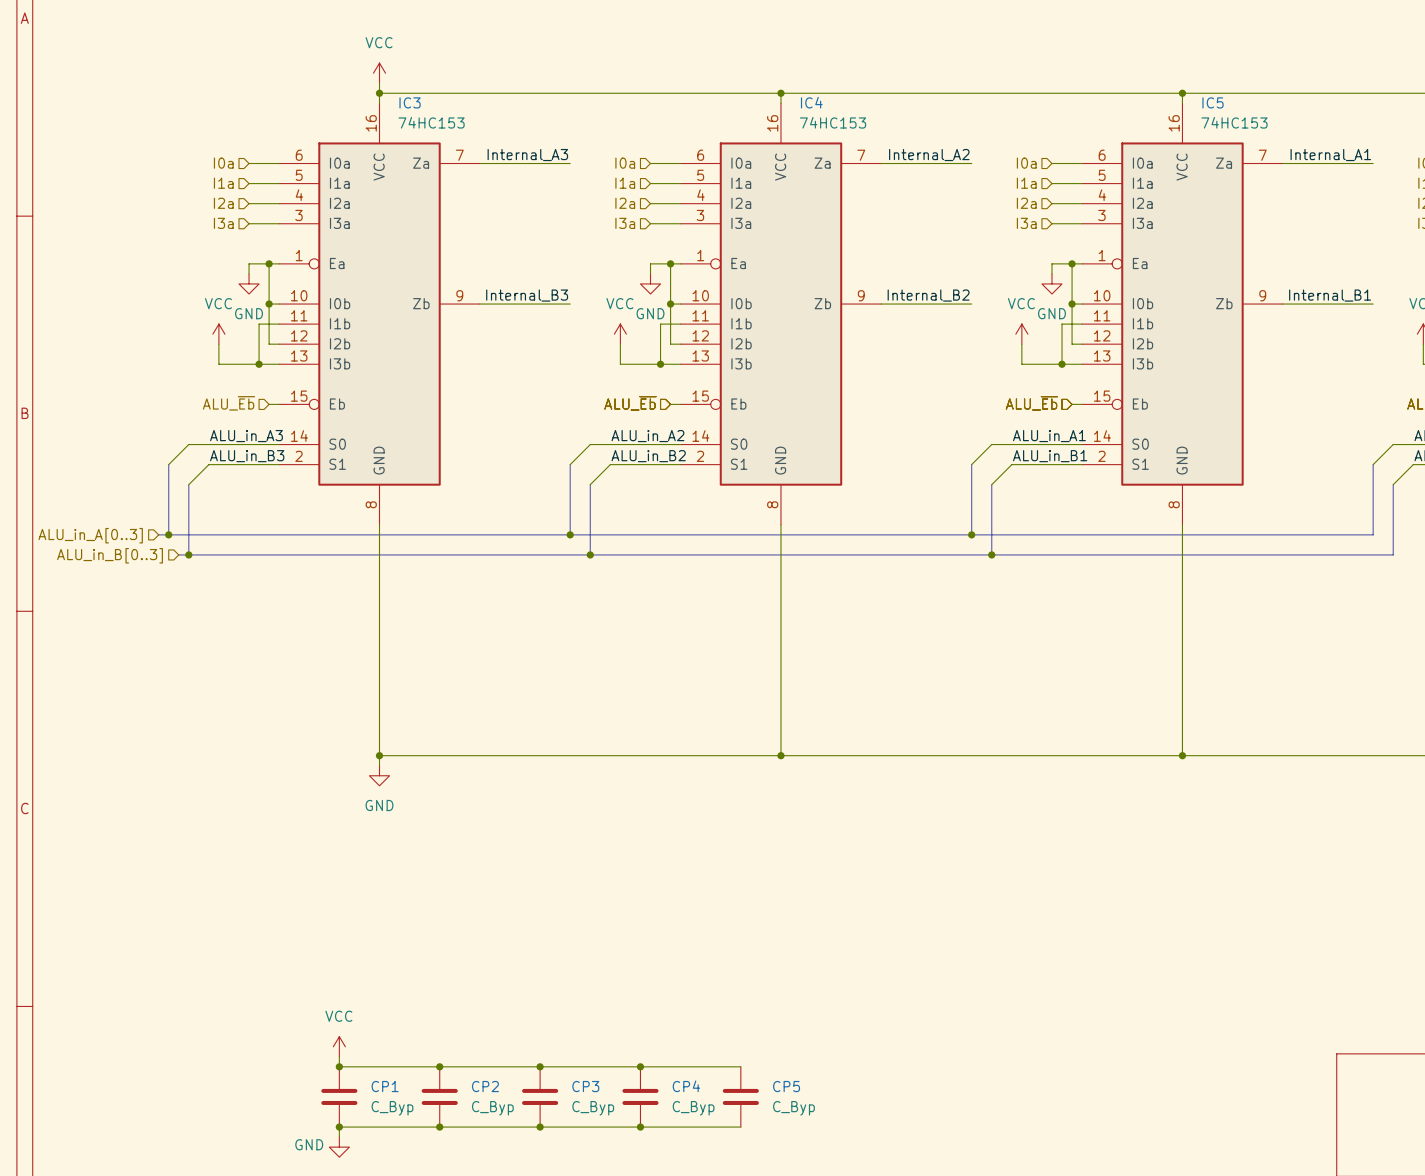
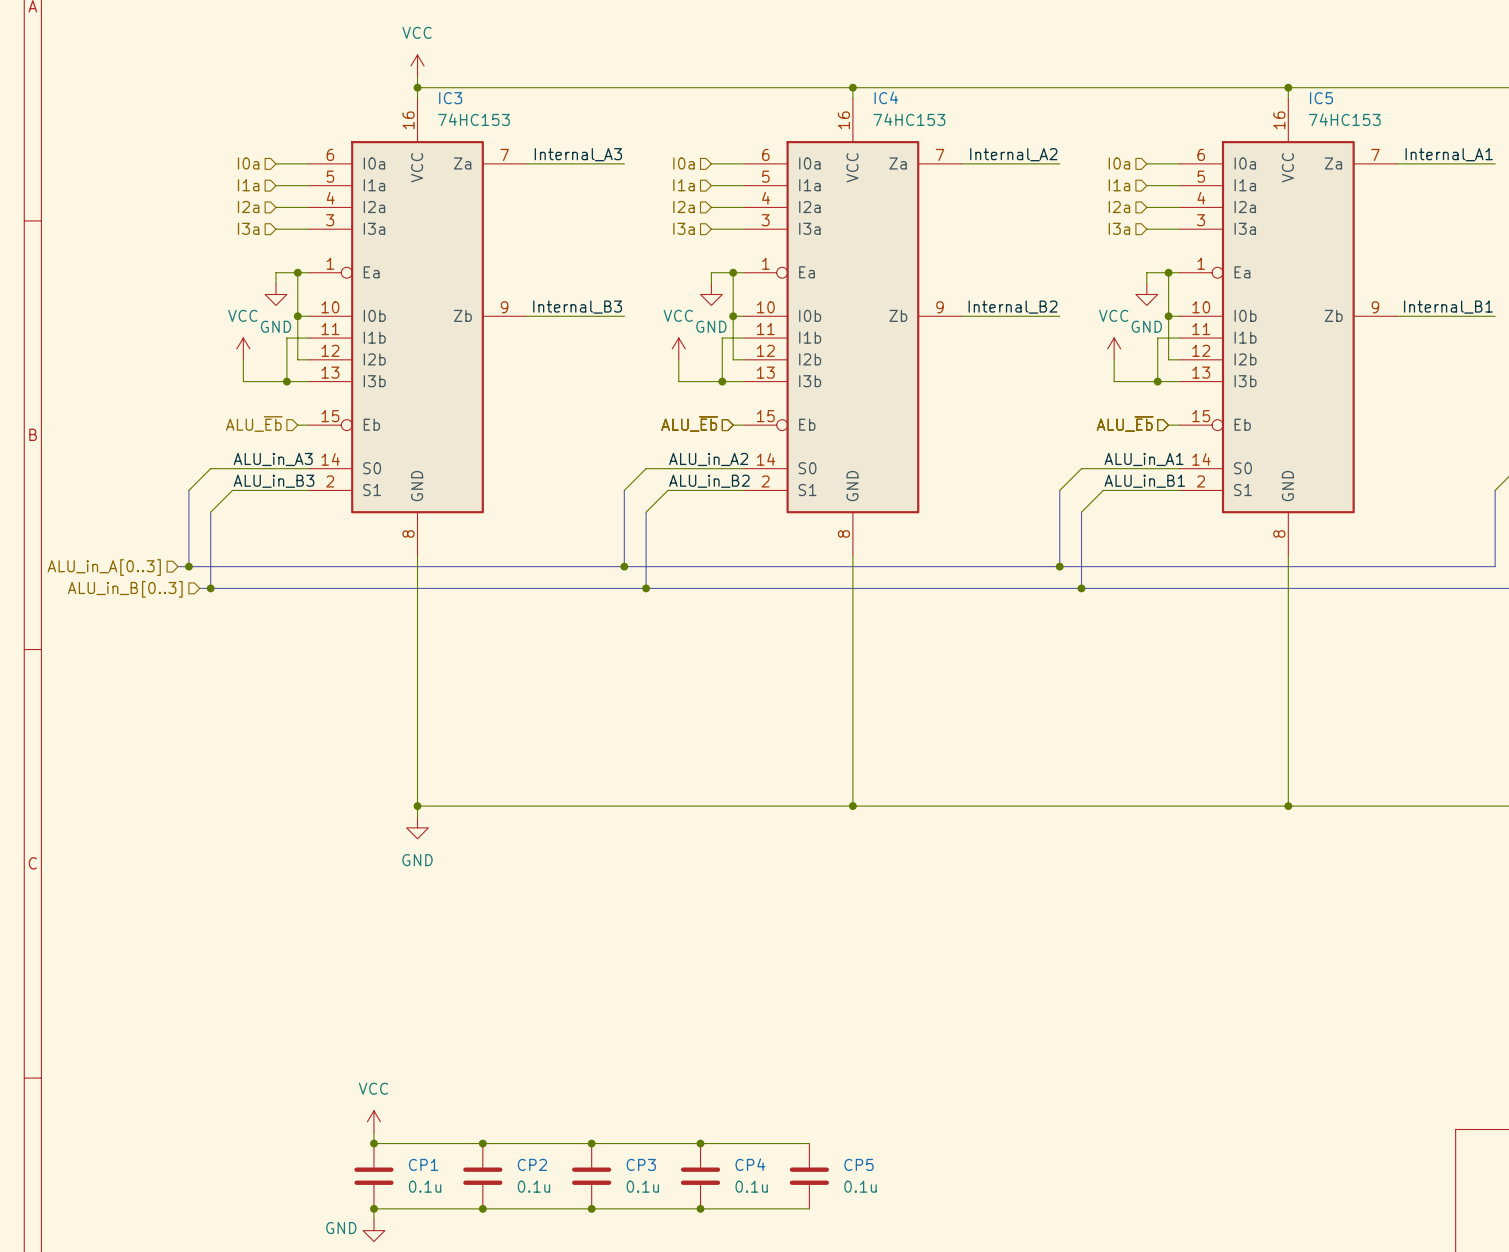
CP1 value: C_Byp (392, 1108) -> 0.1u (425, 1186)
CP2 value: C_Byp (492, 1108) -> 0.1u (533, 1186)
CP3 value: C_Byp (593, 1108) -> 0.1u (642, 1186)
CP4 value: C_Byp (693, 1108) -> 0.1u (751, 1186)
CP5 value: C_Byp (793, 1108) -> 0.1u (860, 1186)

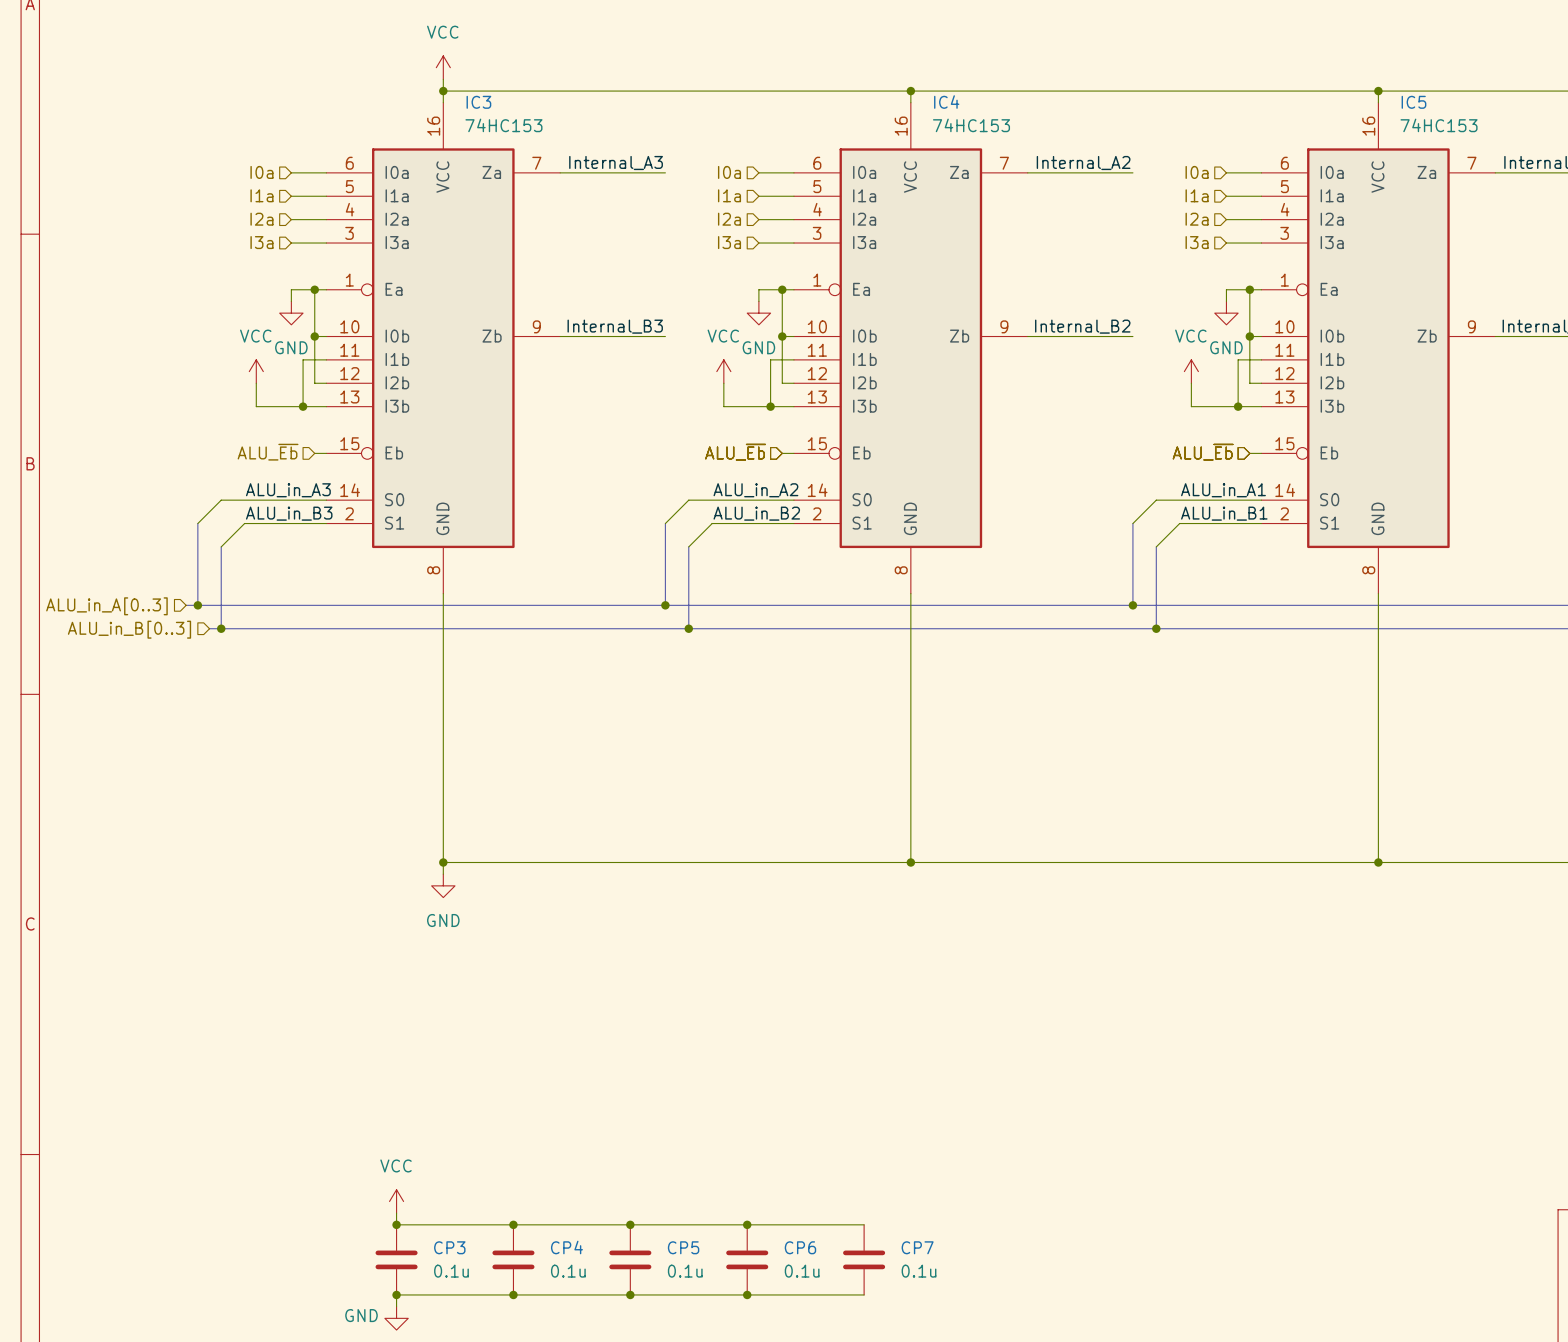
CP1 name: CP1 (423, 1164) -> CP3 (449, 1247)
CP2 name: CP2 (532, 1164) -> CP4 (566, 1247)
CP3 name: CP3 (641, 1164) -> CP5 (683, 1247)
CP4 name: CP4 (750, 1164) -> CP6 (800, 1247)
CP5 name: CP5 (858, 1164) -> CP7 (917, 1247)

